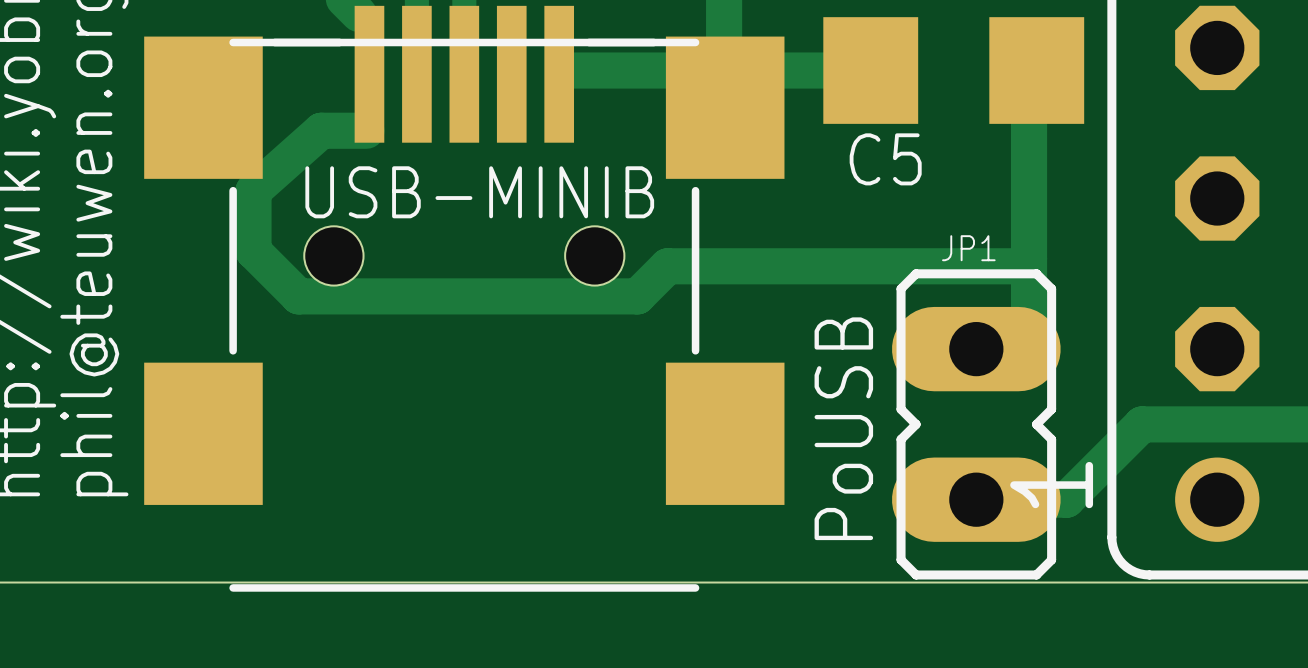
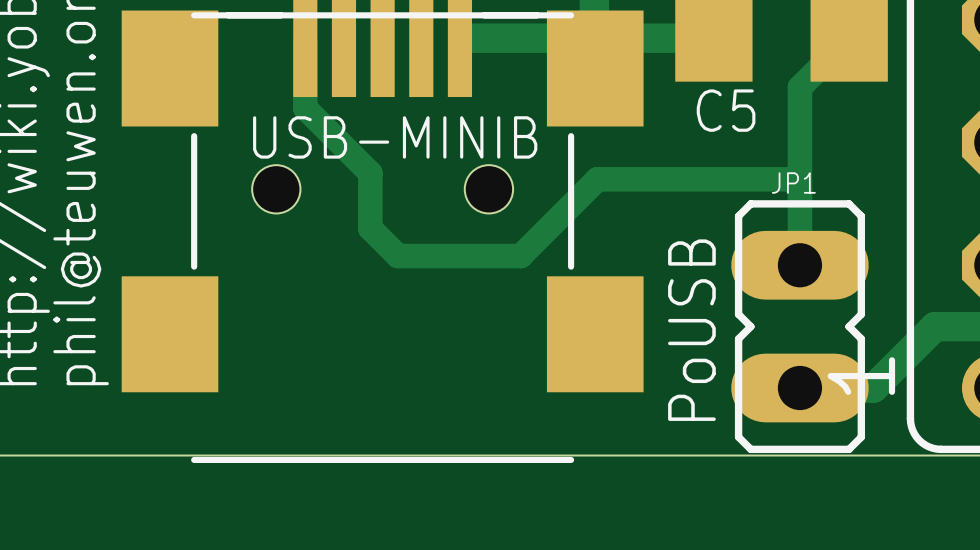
track: none -> (305, 41) (305, 108) (370, 173) (370, 228) (397, 256) (520, 256) (597, 179) (790, 179) (799, 188)
track: (1029, 78) (1029, 326) (1006, 349) (976, 349) -> (842, 44) (799, 87) (799, 265) (790, 256)
track: (369, 127) (366, 130) (321, 130) (253, 190) (253, 251) (298, 296) (637, 296) (667, 266) (1021, 266) (1029, 258) -> none

